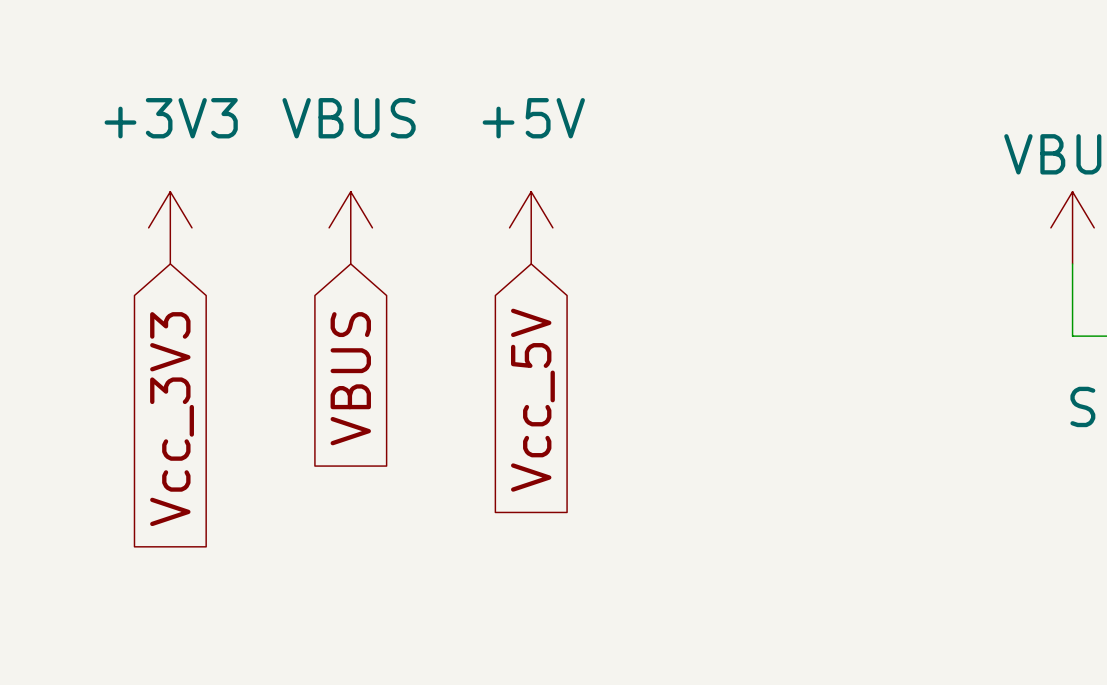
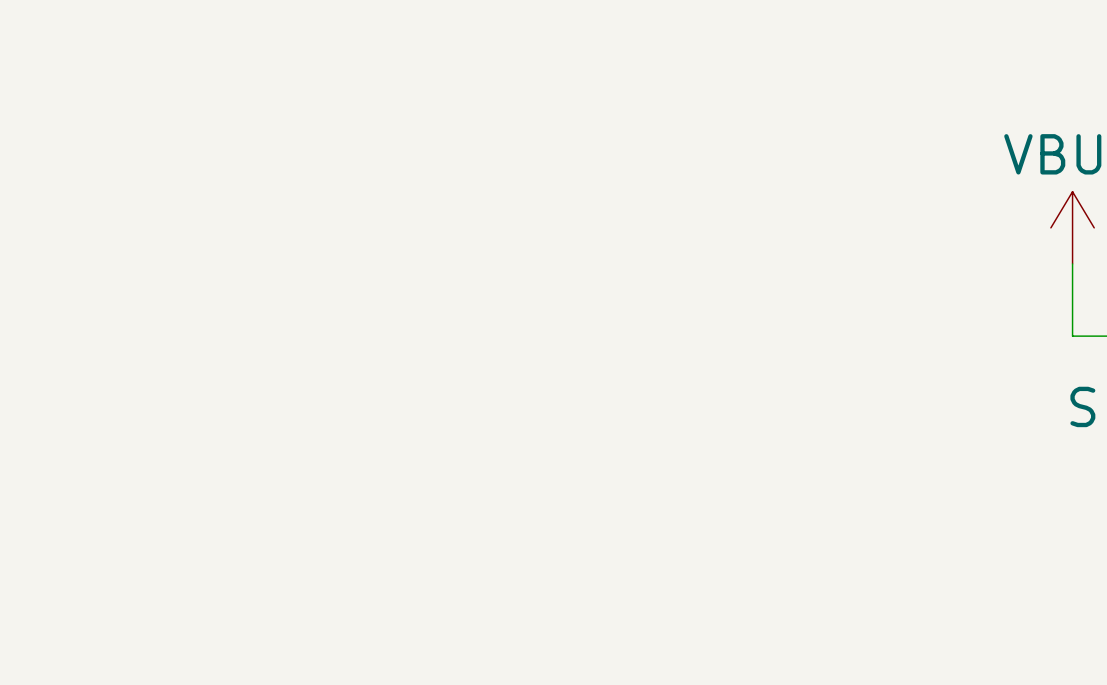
power symbol: +3V3 (170, 227) -> none
power symbol: VBUS (350, 227) -> none
power symbol: +5V (531, 227) -> none
global label: VBUS (350, 378) -> none
global label: Vcc_5V (532, 400) -> none
global label: Vcc_3V3 (172, 419) -> none

